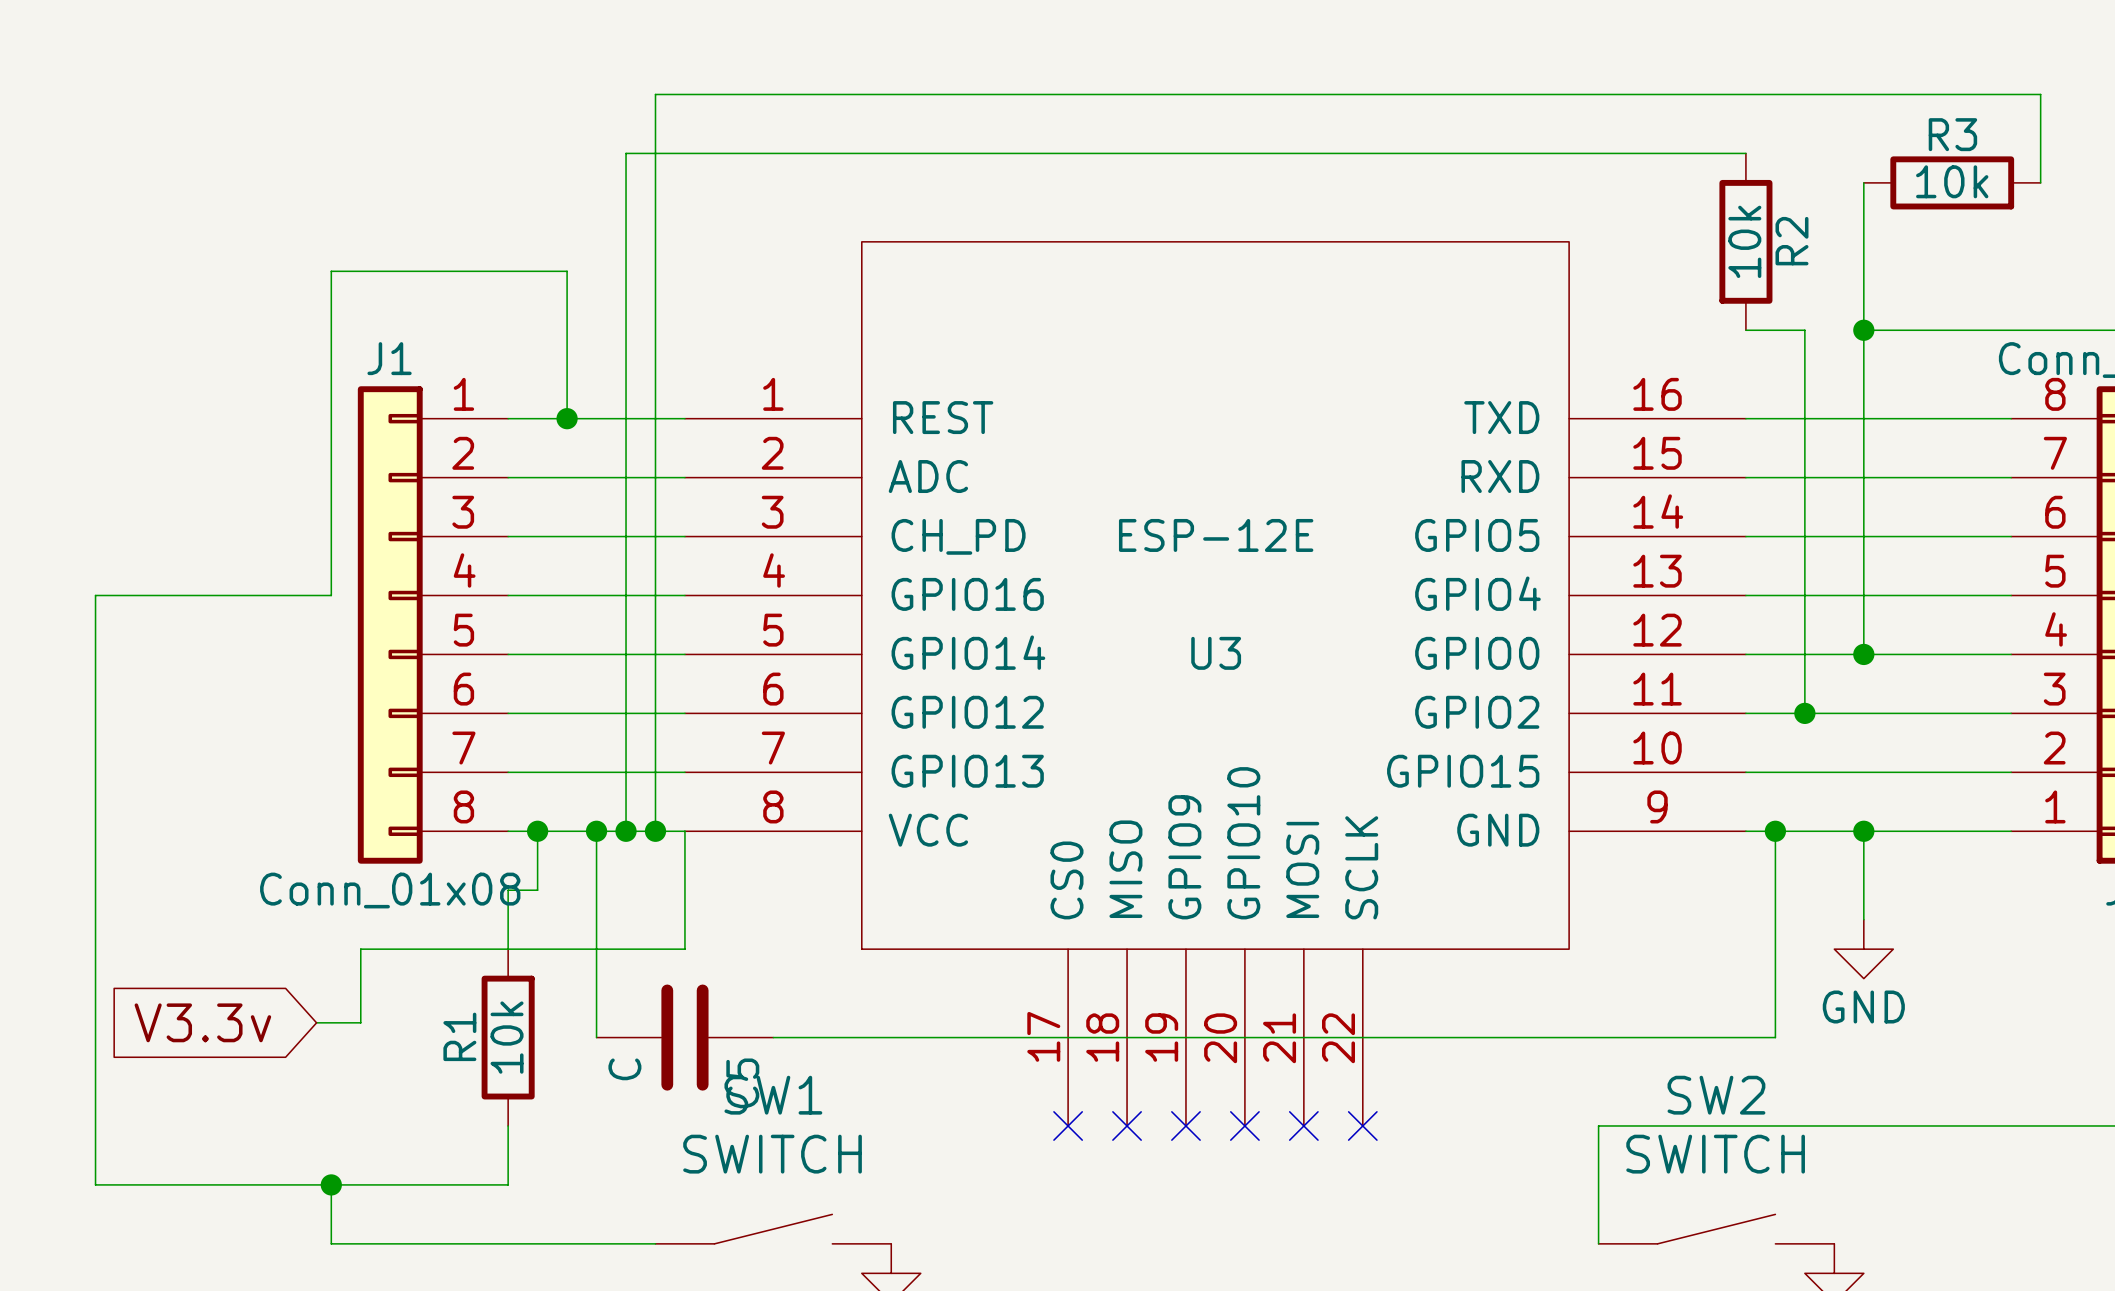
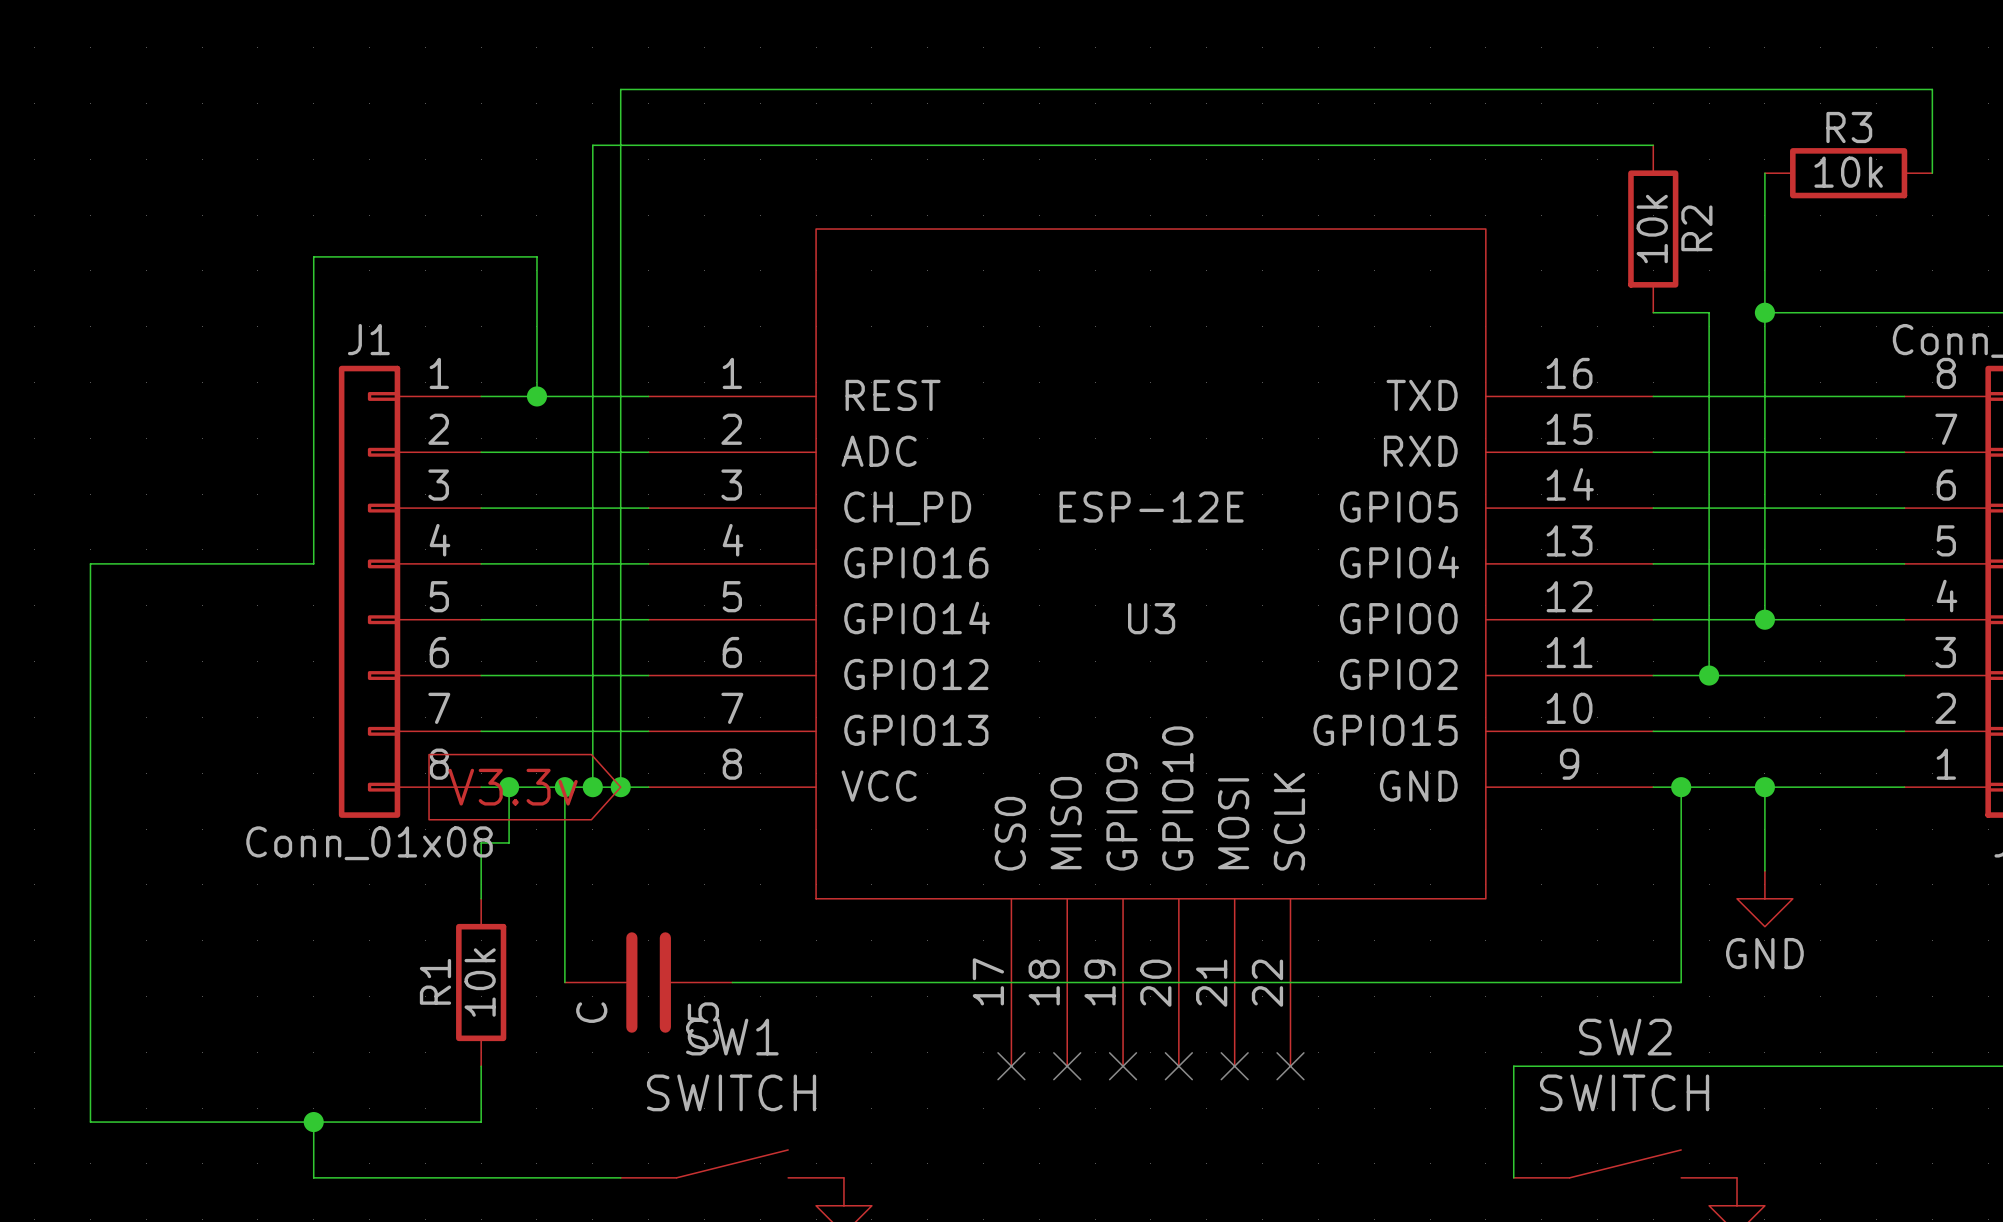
wire: (684, 831) (684, 949) (360, 949) (360, 1022) (316, 1022) -> none
global label position: V3.3v (202, 1022) -> V3.3v (513, 787)

